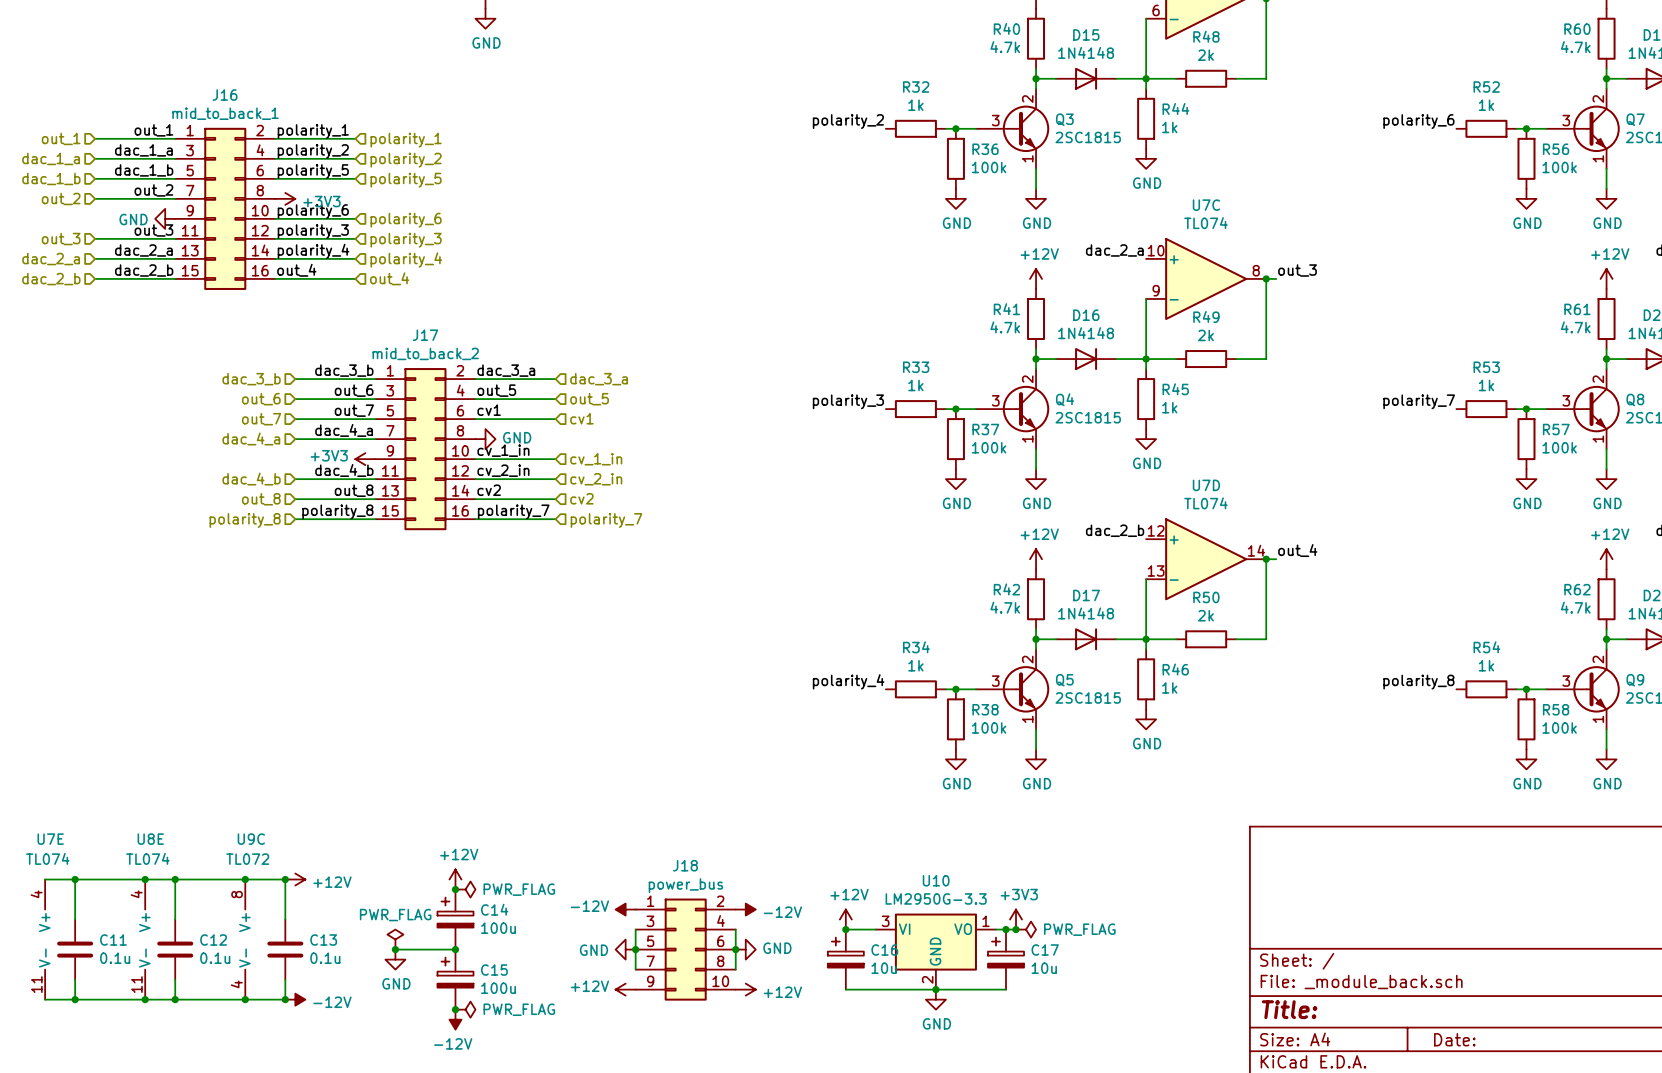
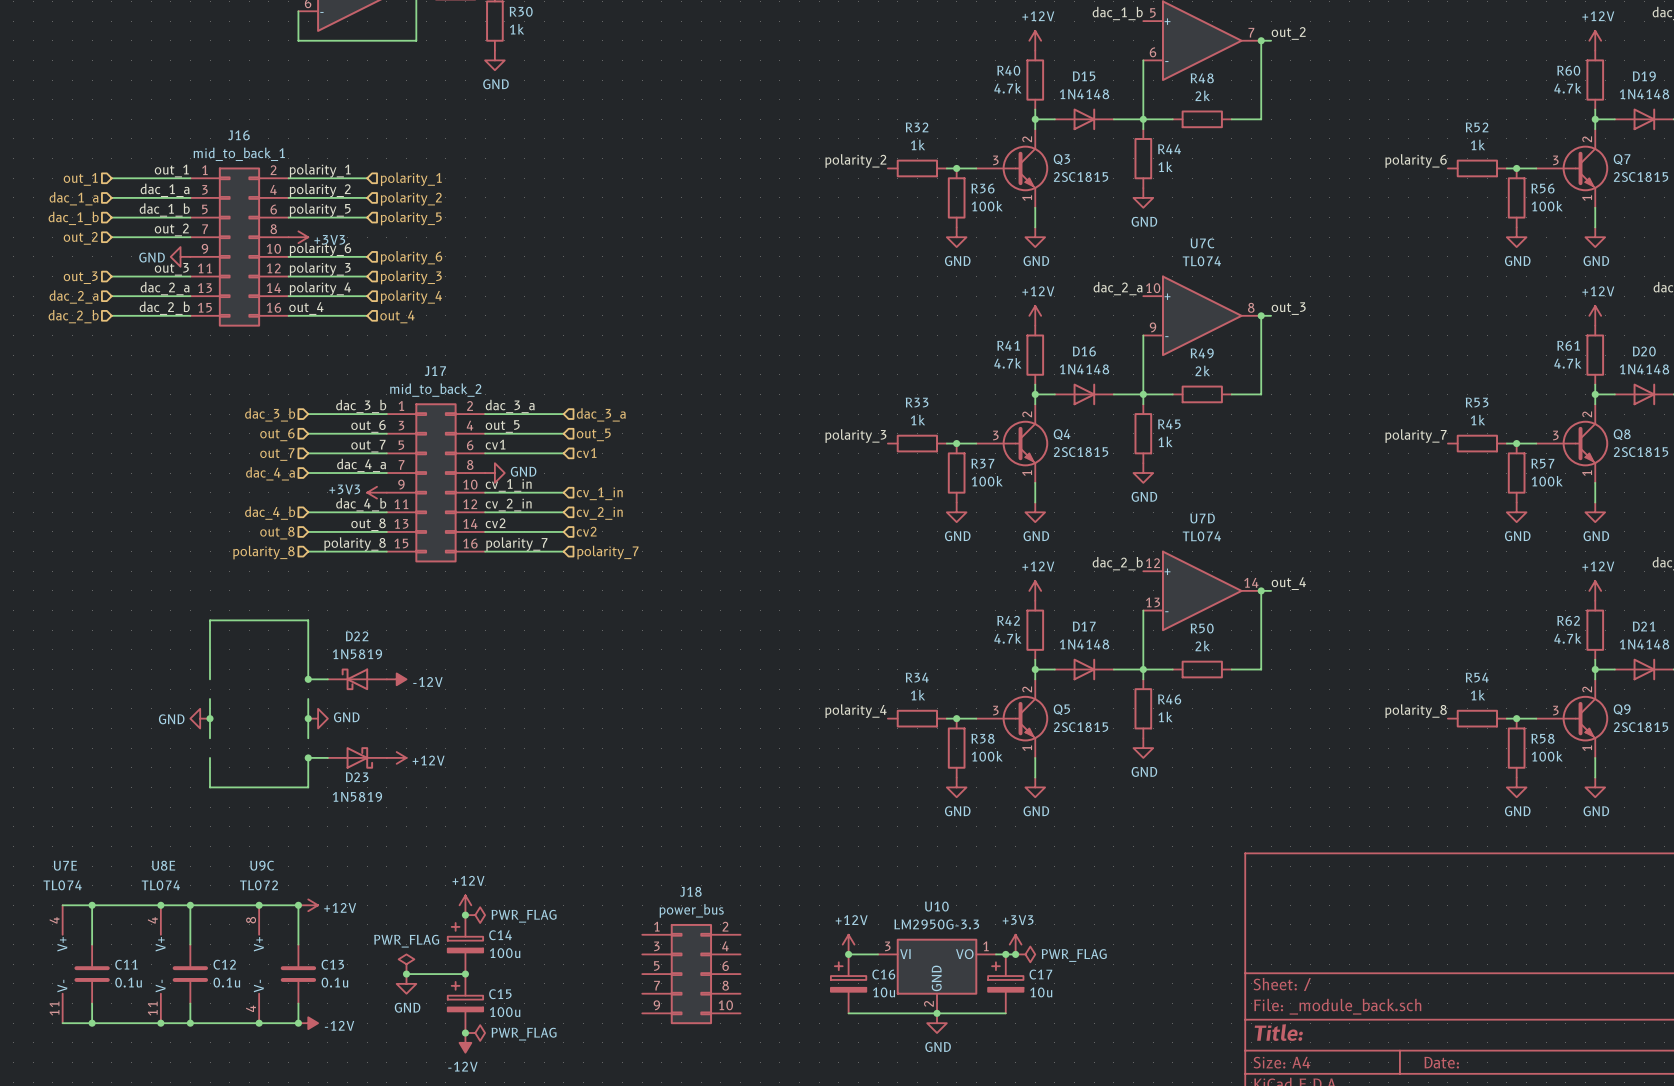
wire: none -> (210, 679) (210, 620) (308, 620) (308, 679) (327, 679)
junction: none -> (308, 679)
D22: none -> 1N5819 (357, 679)
power symbol: none -> -12V (396, 679)
wire: none -> (210, 698) (210, 738)
wire: none -> (308, 698) (308, 738)
power symbol: none -> GND (200, 718)
junction: none -> (210, 718)
junction: none -> (308, 718)
power symbol: none -> GND (318, 718)
wire: none -> (210, 757) (210, 787) (308, 787) (308, 757) (327, 757)
junction: none -> (308, 757)
D23: none -> 1N5819 (357, 757)
power symbol: none -> +12V (396, 757)
power symbol: -12V (625, 909) -> none
power symbol: -12V (745, 909) -> none
wire: (635, 929) (635, 969) -> none
wire: (735, 929) (735, 969) -> none
power symbol: GND (625, 949) -> none
junction: (635, 949) -> none
junction: (735, 949) -> none
power symbol: GND (745, 949) -> none
power symbol: +12V (625, 989) -> none
power symbol: +12V (745, 989) -> none

